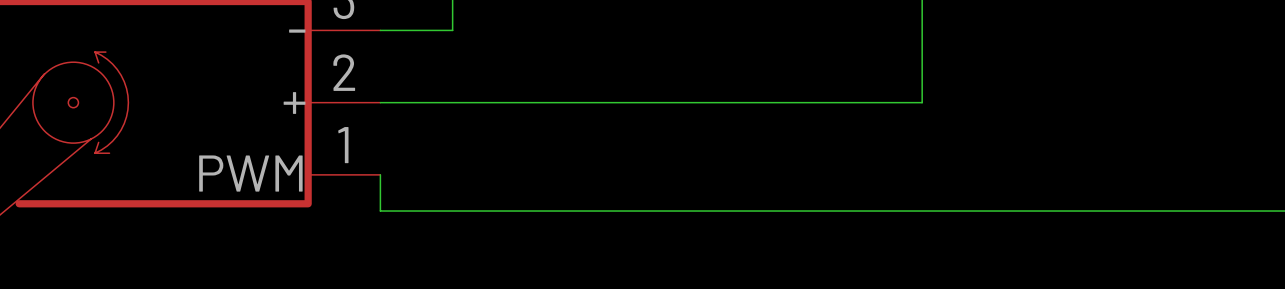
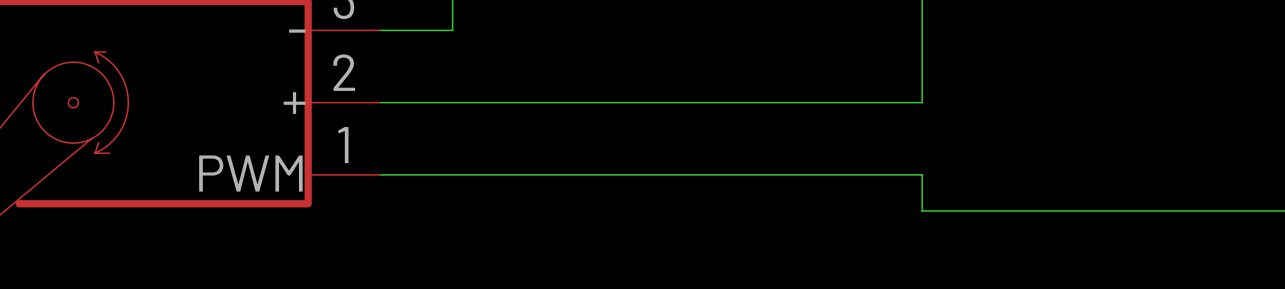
wire: (380, 174) (380, 211) (922, 211) -> (380, 174) (922, 174) (922, 211)

